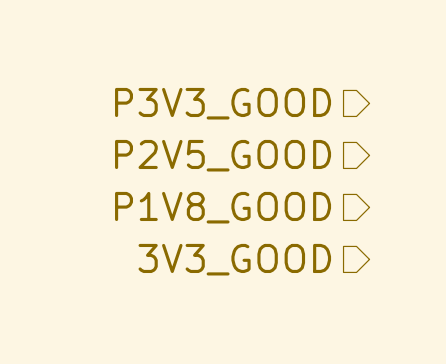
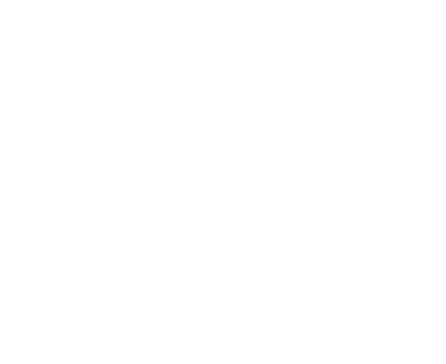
hierarchical label: P3V3_GOOD (223, 103) -> none
hierarchical label: P2V5_GOOD (223, 155) -> none
hierarchical label: P1V8_GOOD (223, 207) -> none
hierarchical label: 3V3_GOOD (234, 259) -> none

